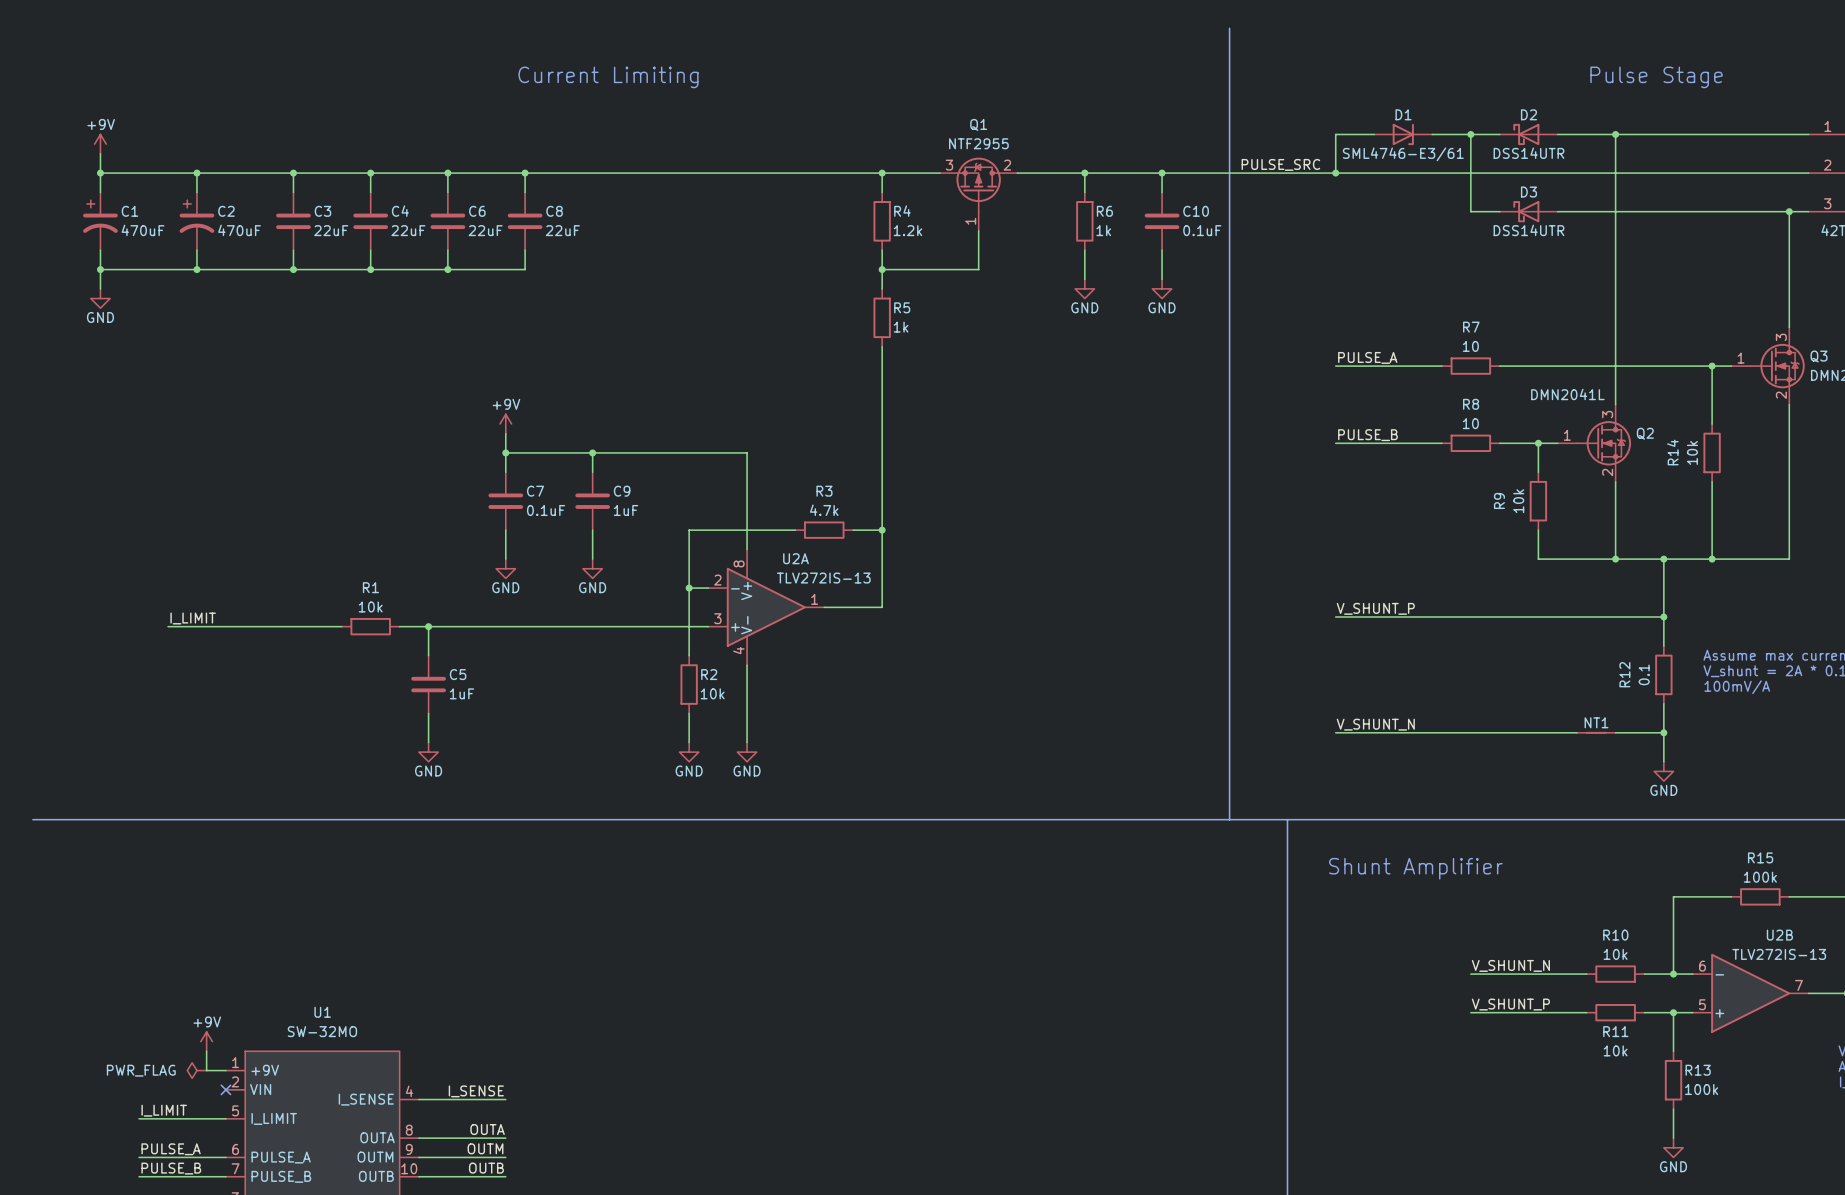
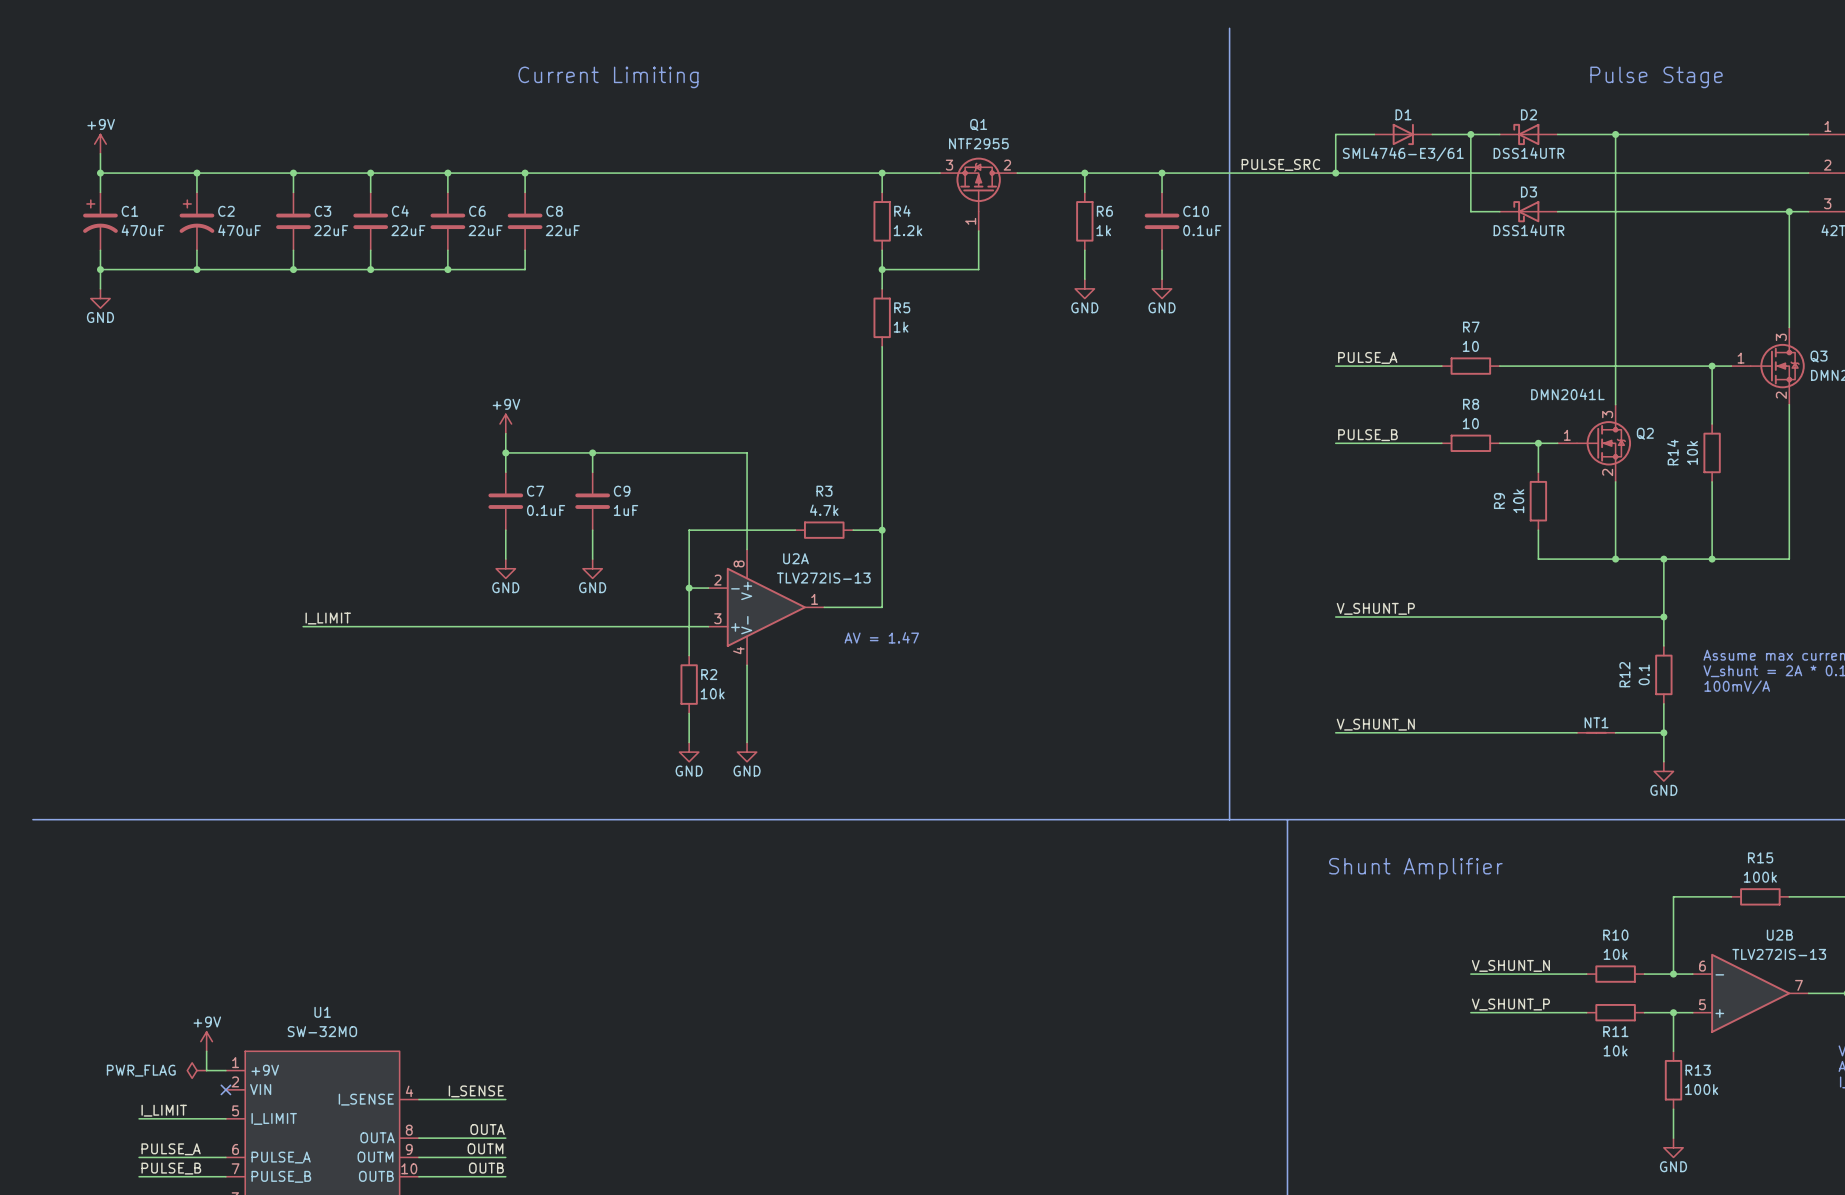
label position: I_LIMIT (193, 618) -> I_LIMIT (328, 618)
wire: (168, 626) (303, 626) -> none
wire: none -> (341, 626) (399, 626)
R1: 10k (370, 626) -> none
wire: (428, 626) (428, 655) -> none
junction: (428, 626) -> none
text: none -> AV = 1.47 (881, 637)
C5: 1uF (428, 684) -> none
wire: (428, 713) (428, 742) -> none
power symbol: GND (428, 752) -> none

